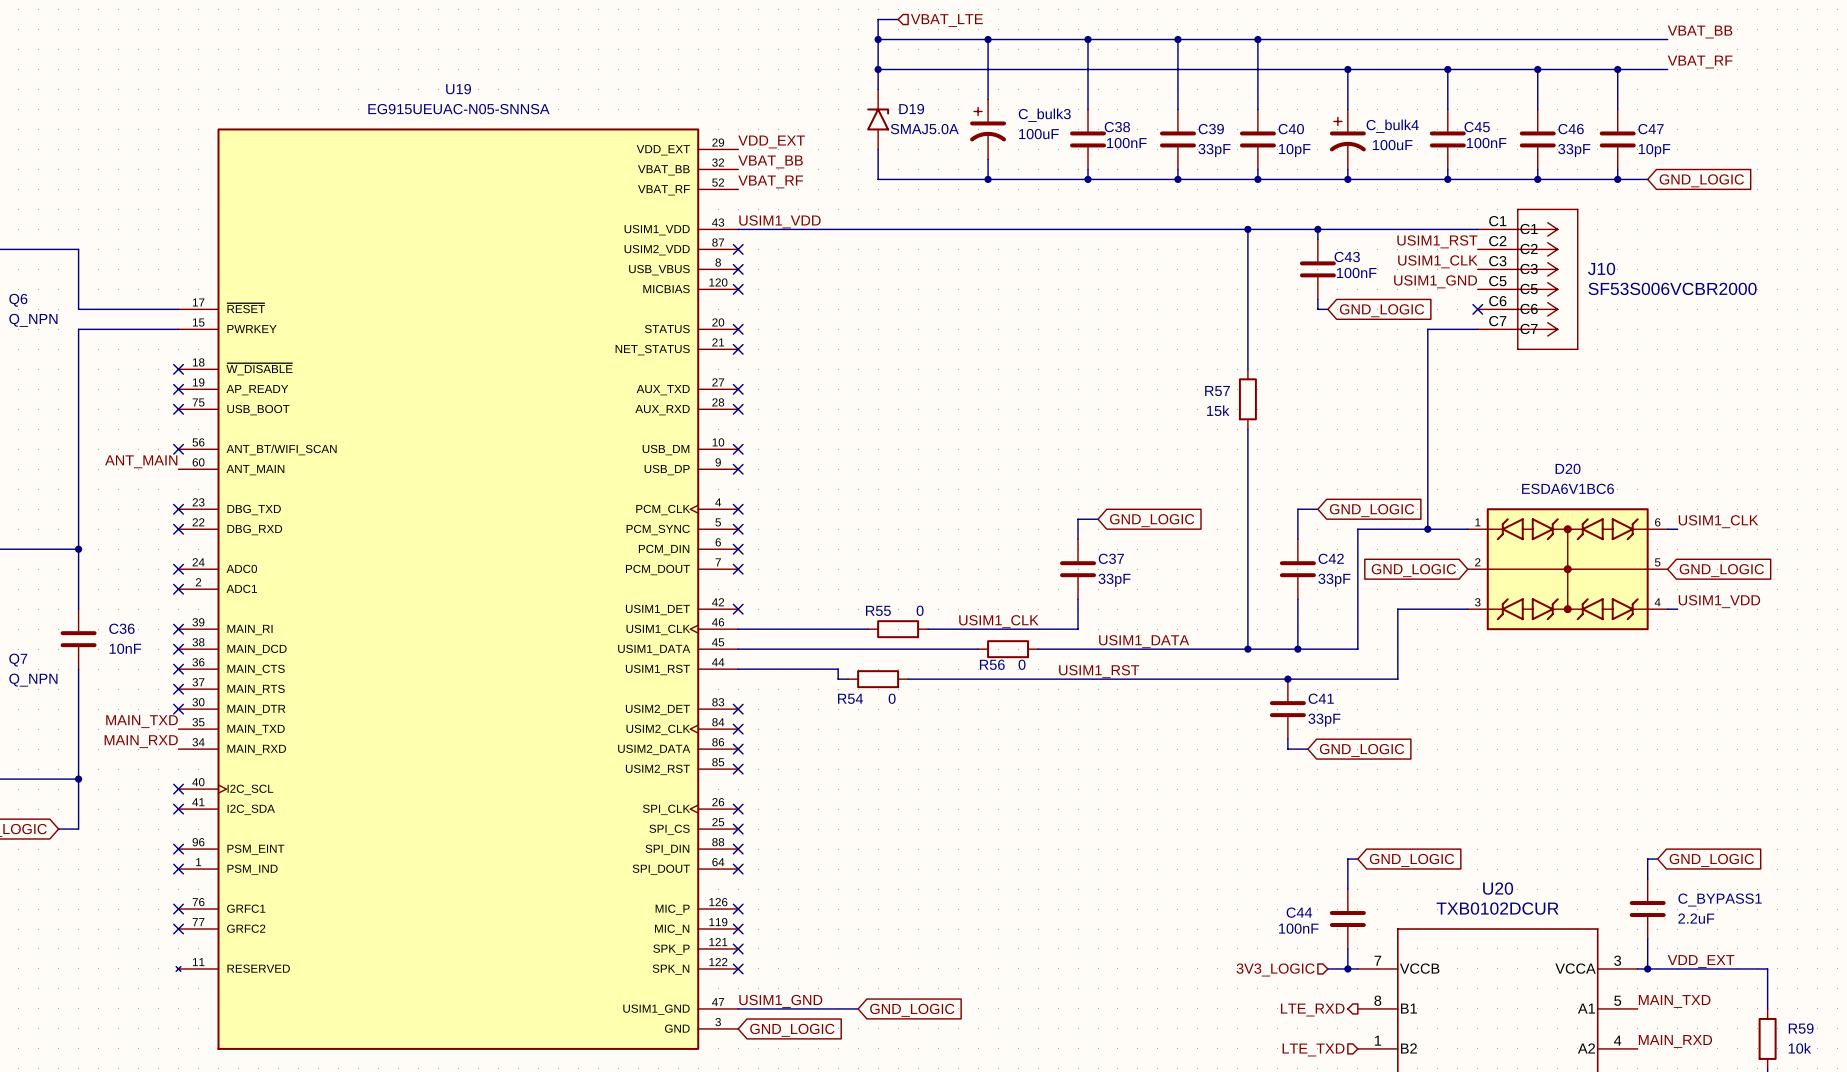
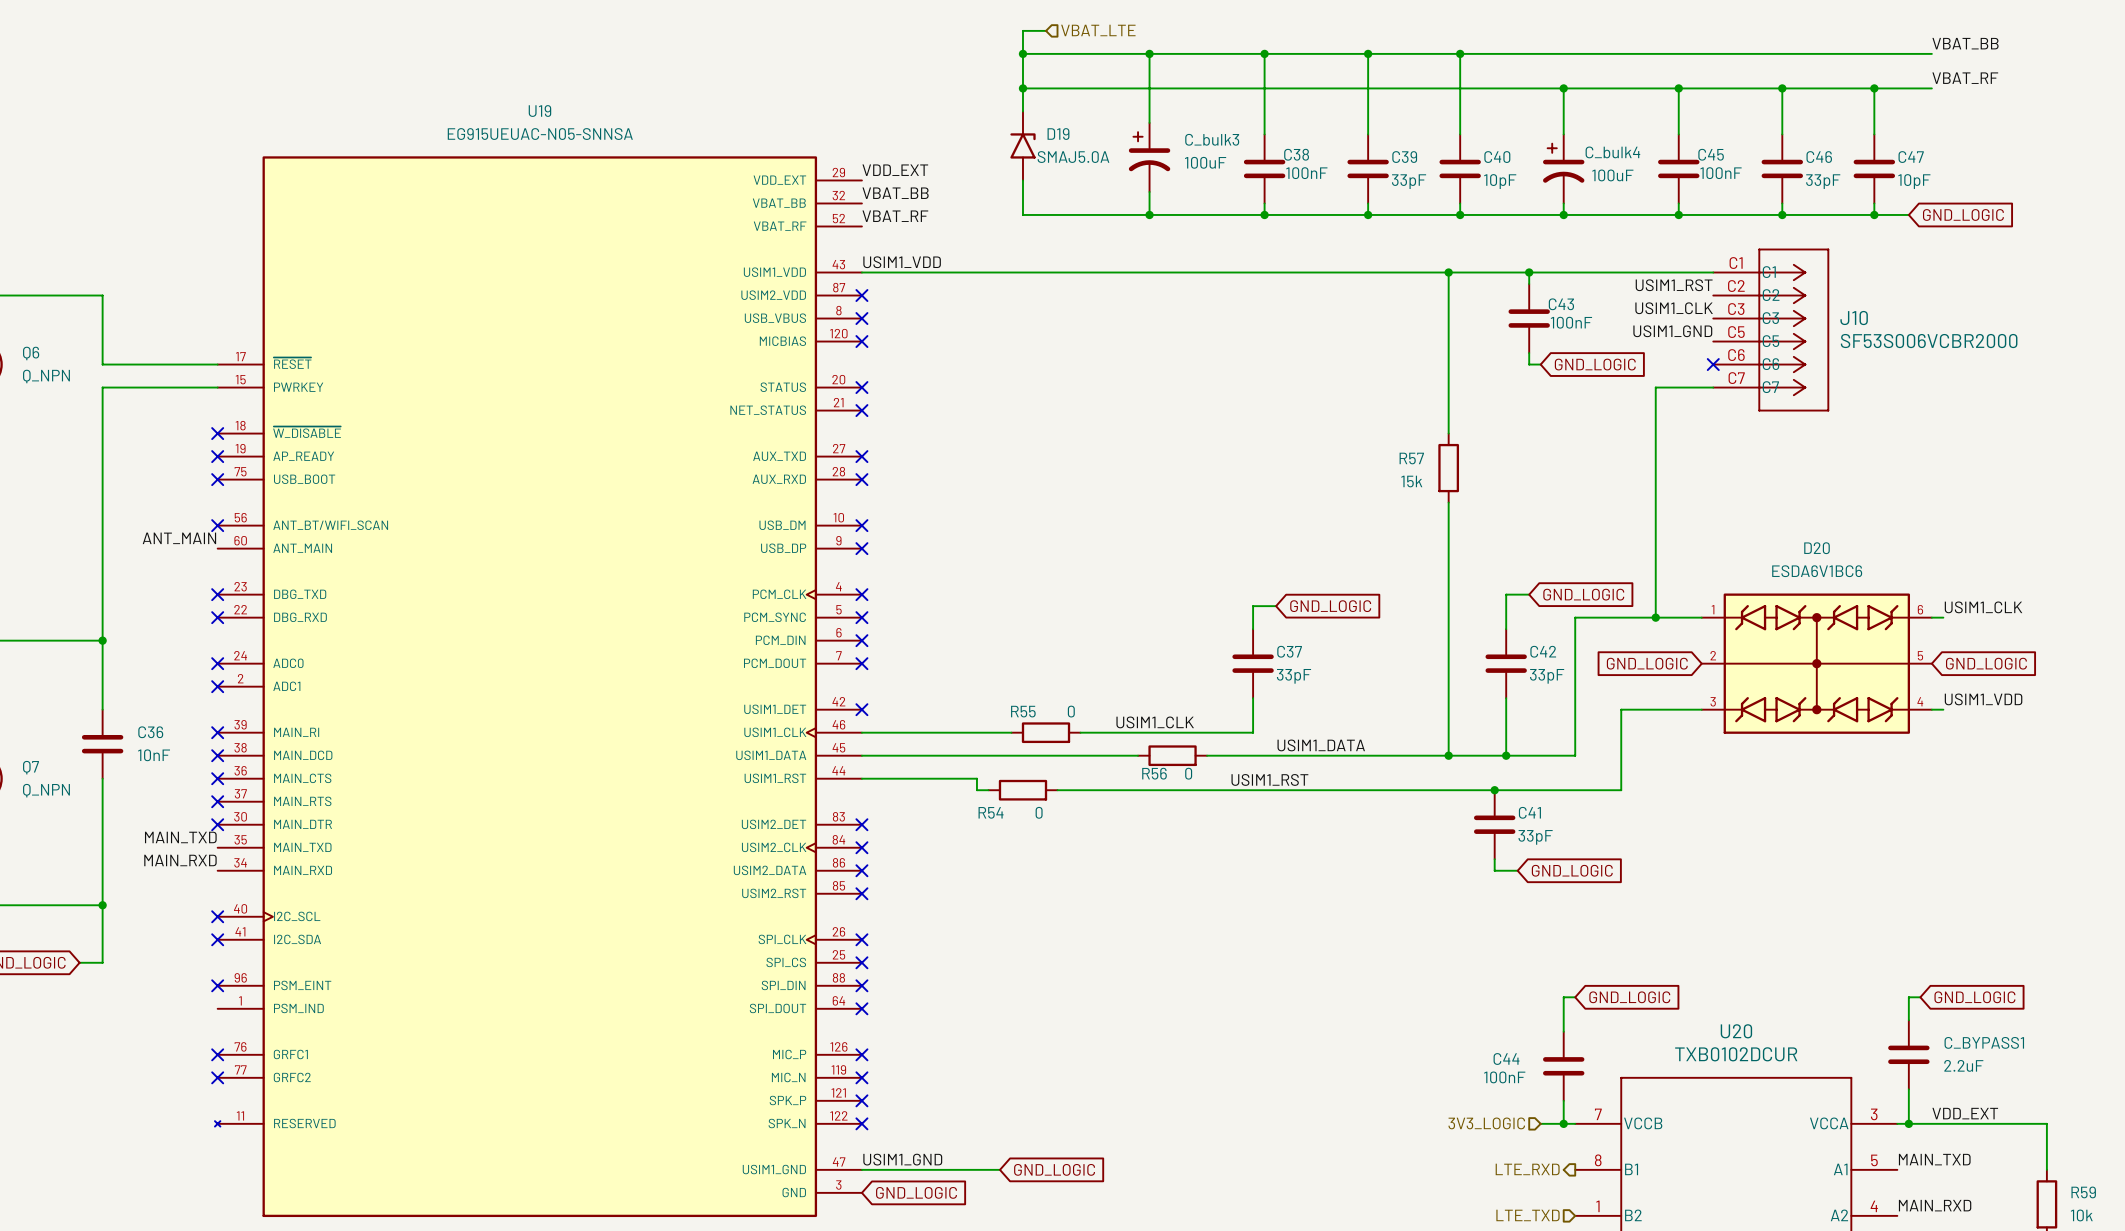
no-connect mark: (178, 869) -> none

